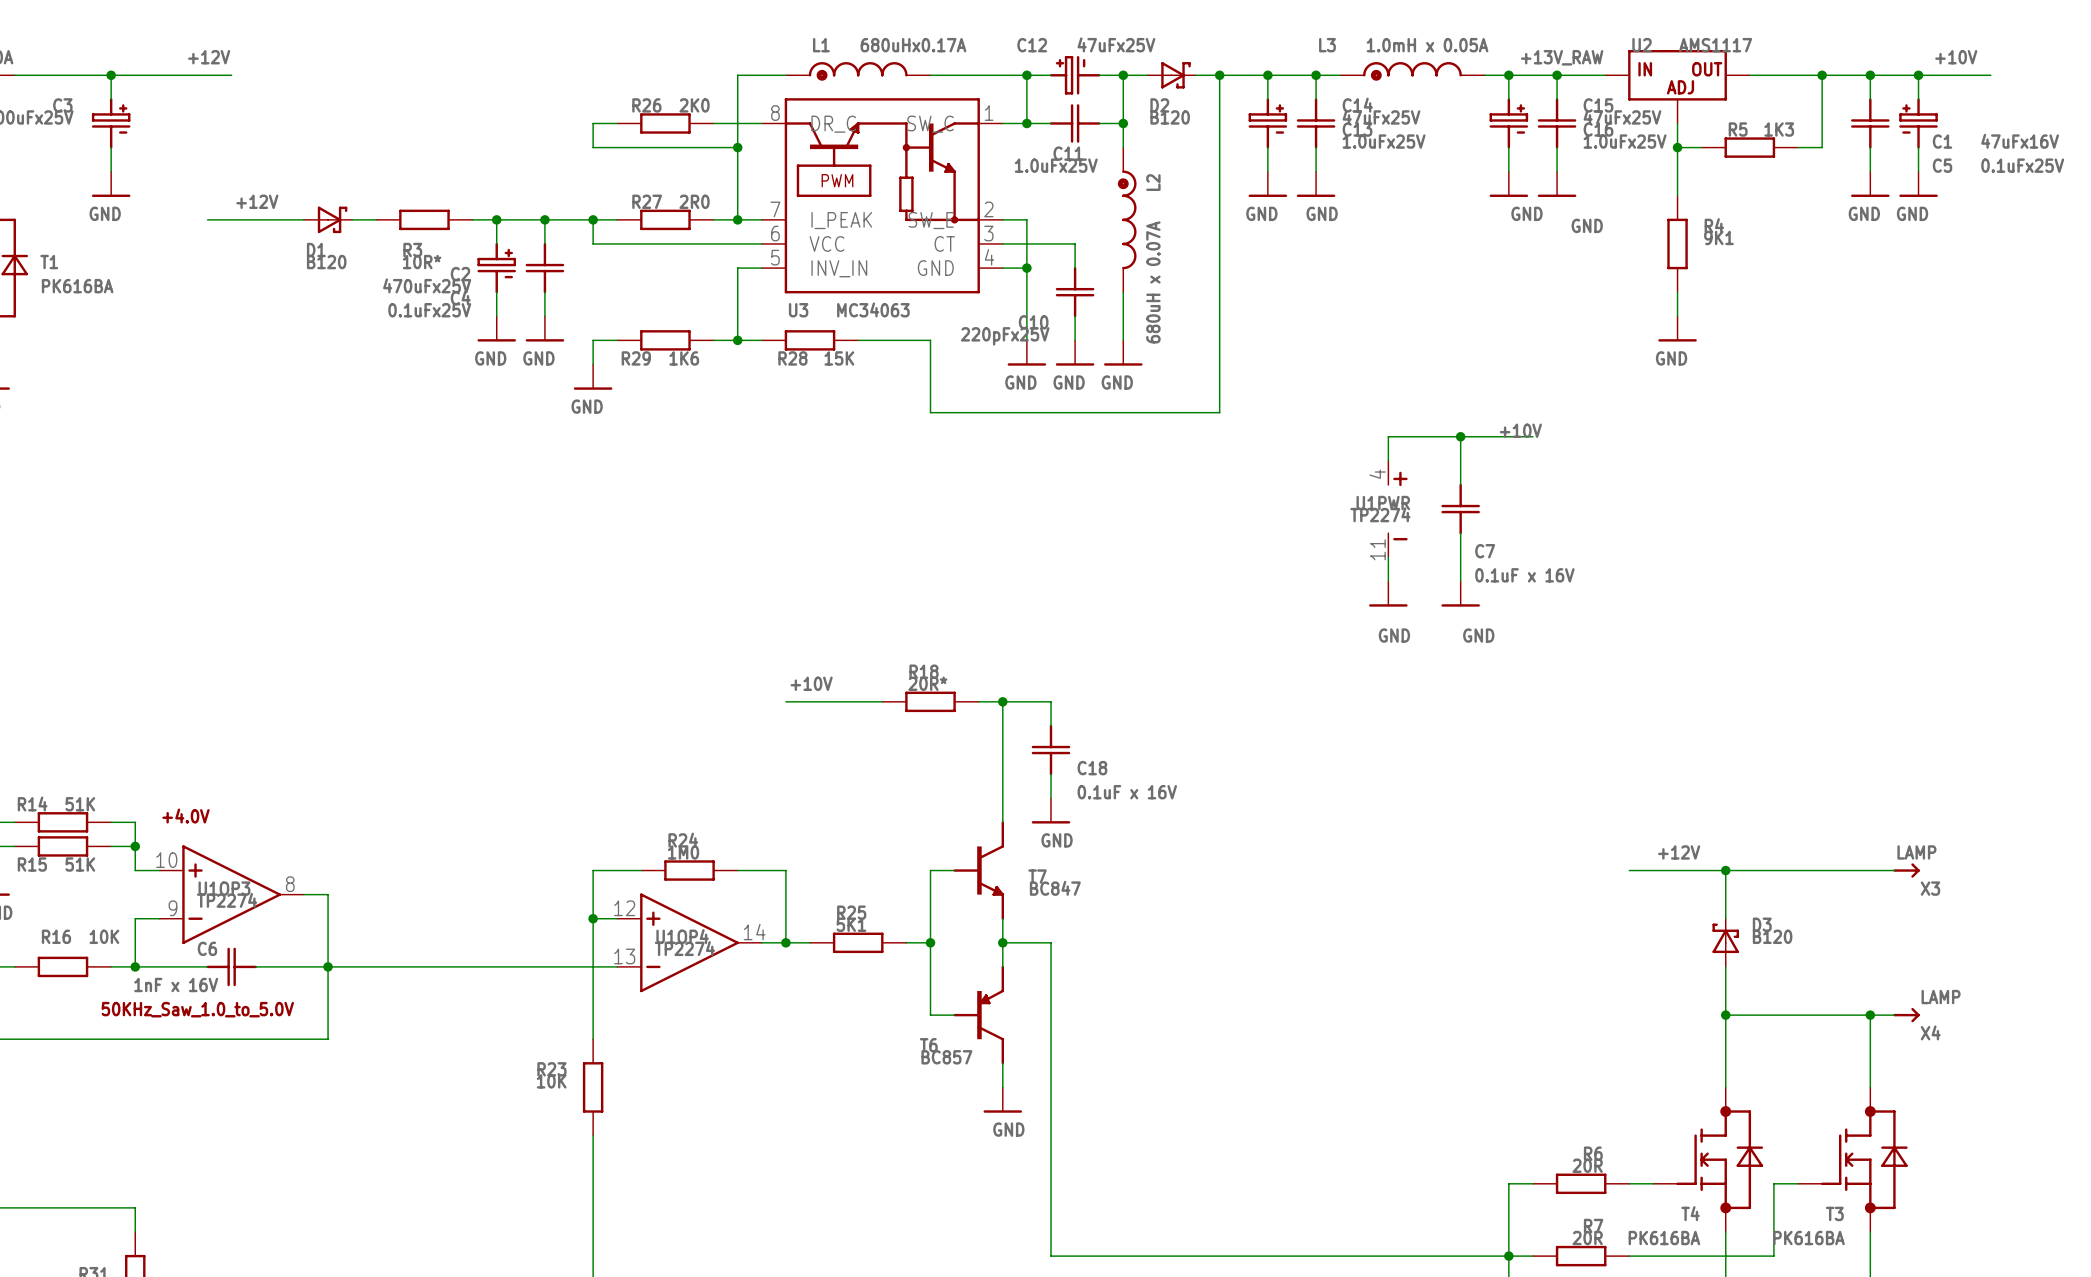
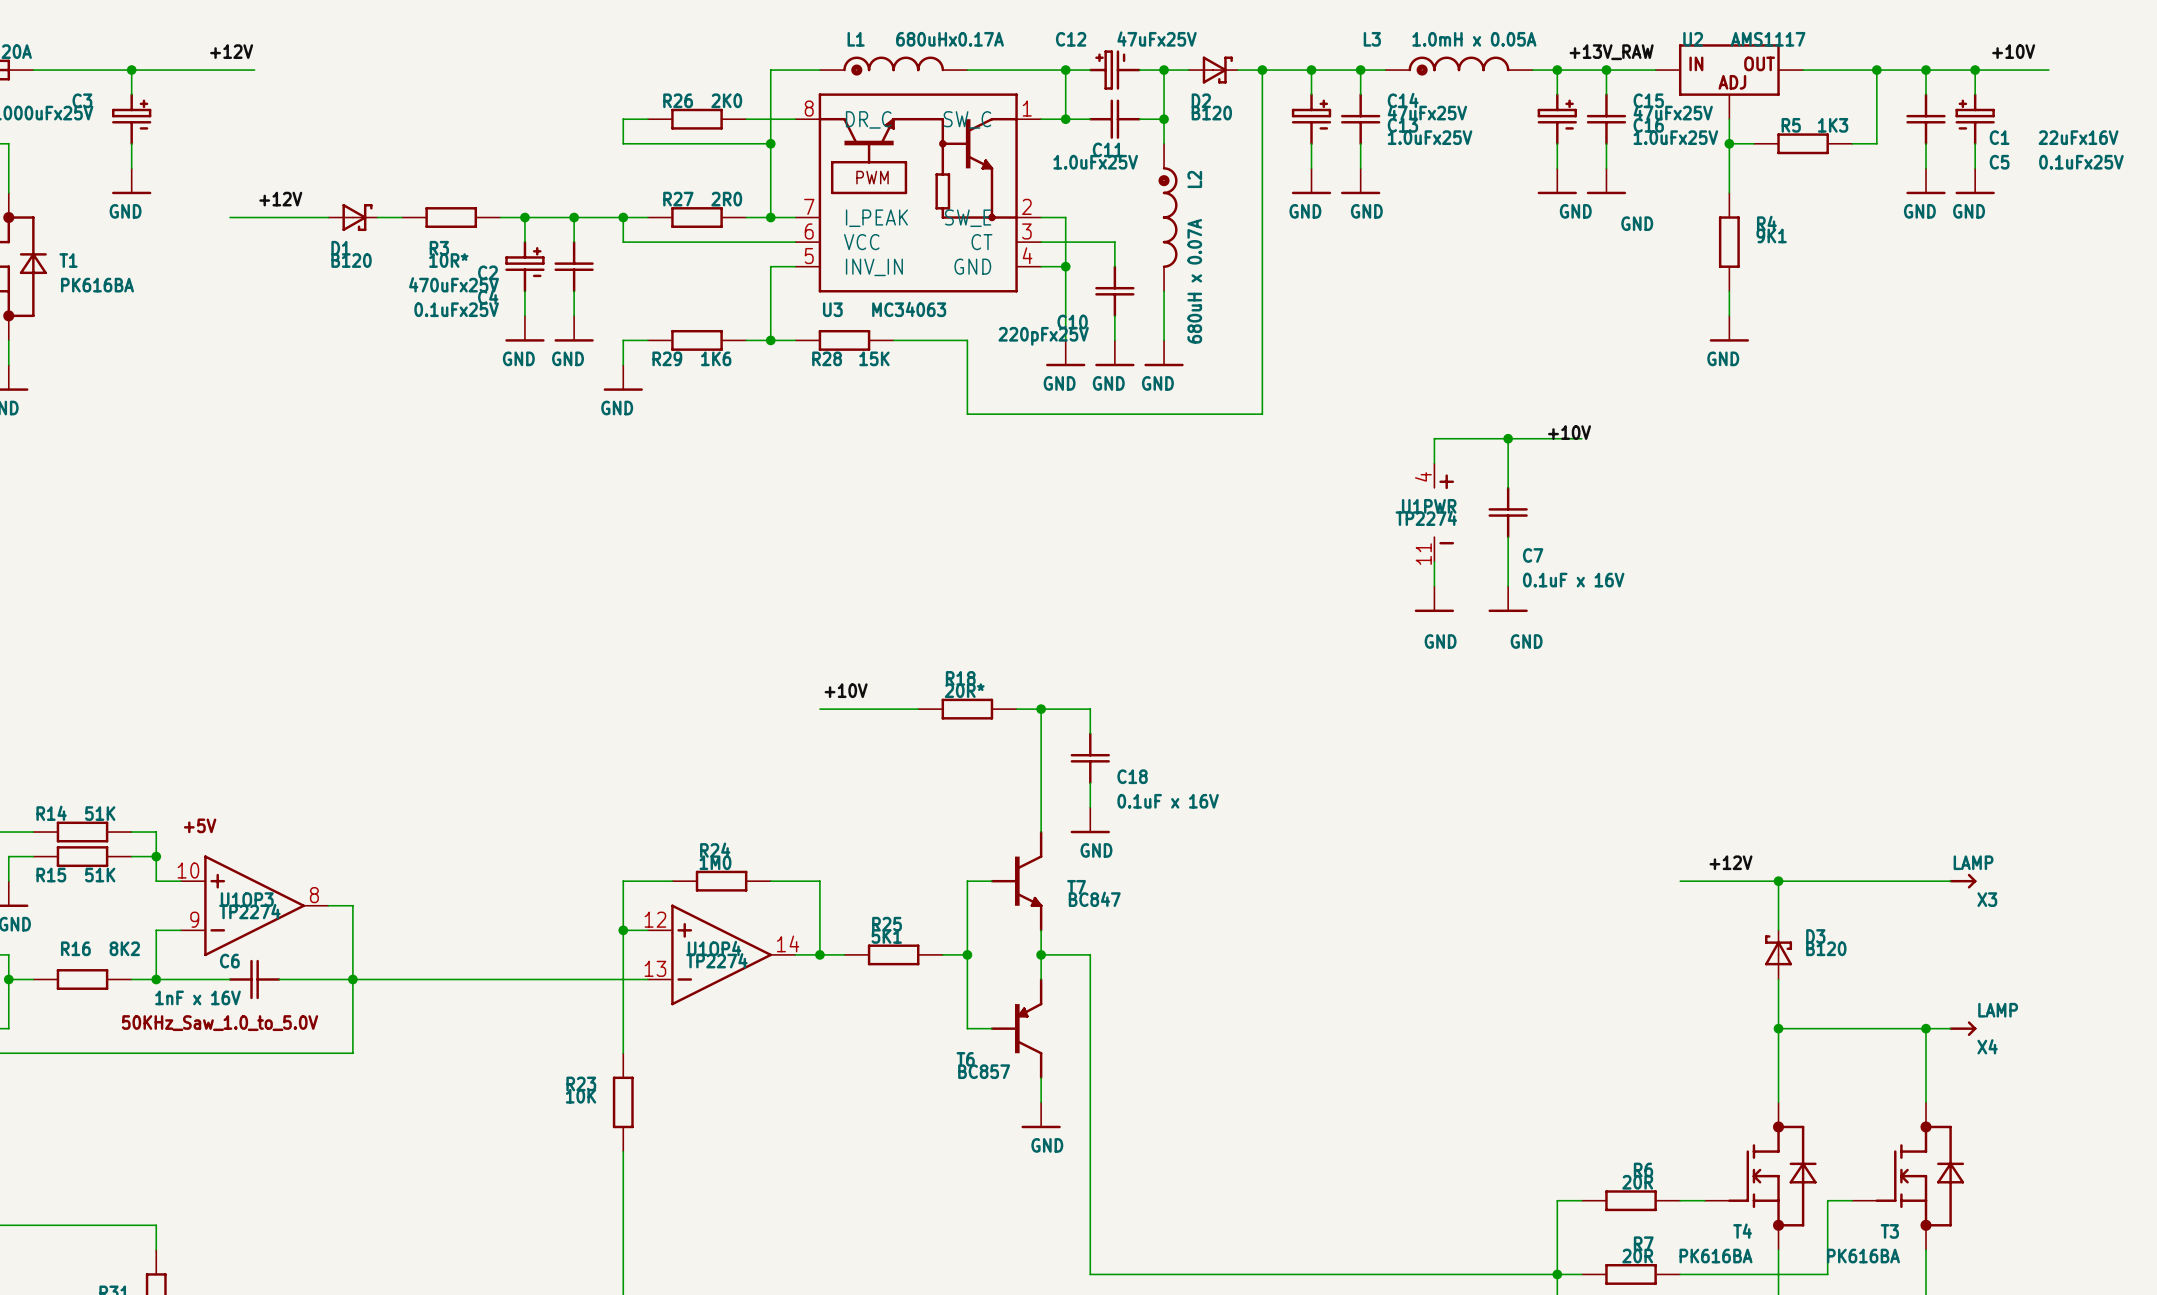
C1 value: 47uFx16V (2020, 141) -> 22uFx16V (2078, 137)
text: +4.0V (185, 816) -> +5V (200, 825)
R16 value: 10K (104, 936) -> 8K2 (124, 948)

